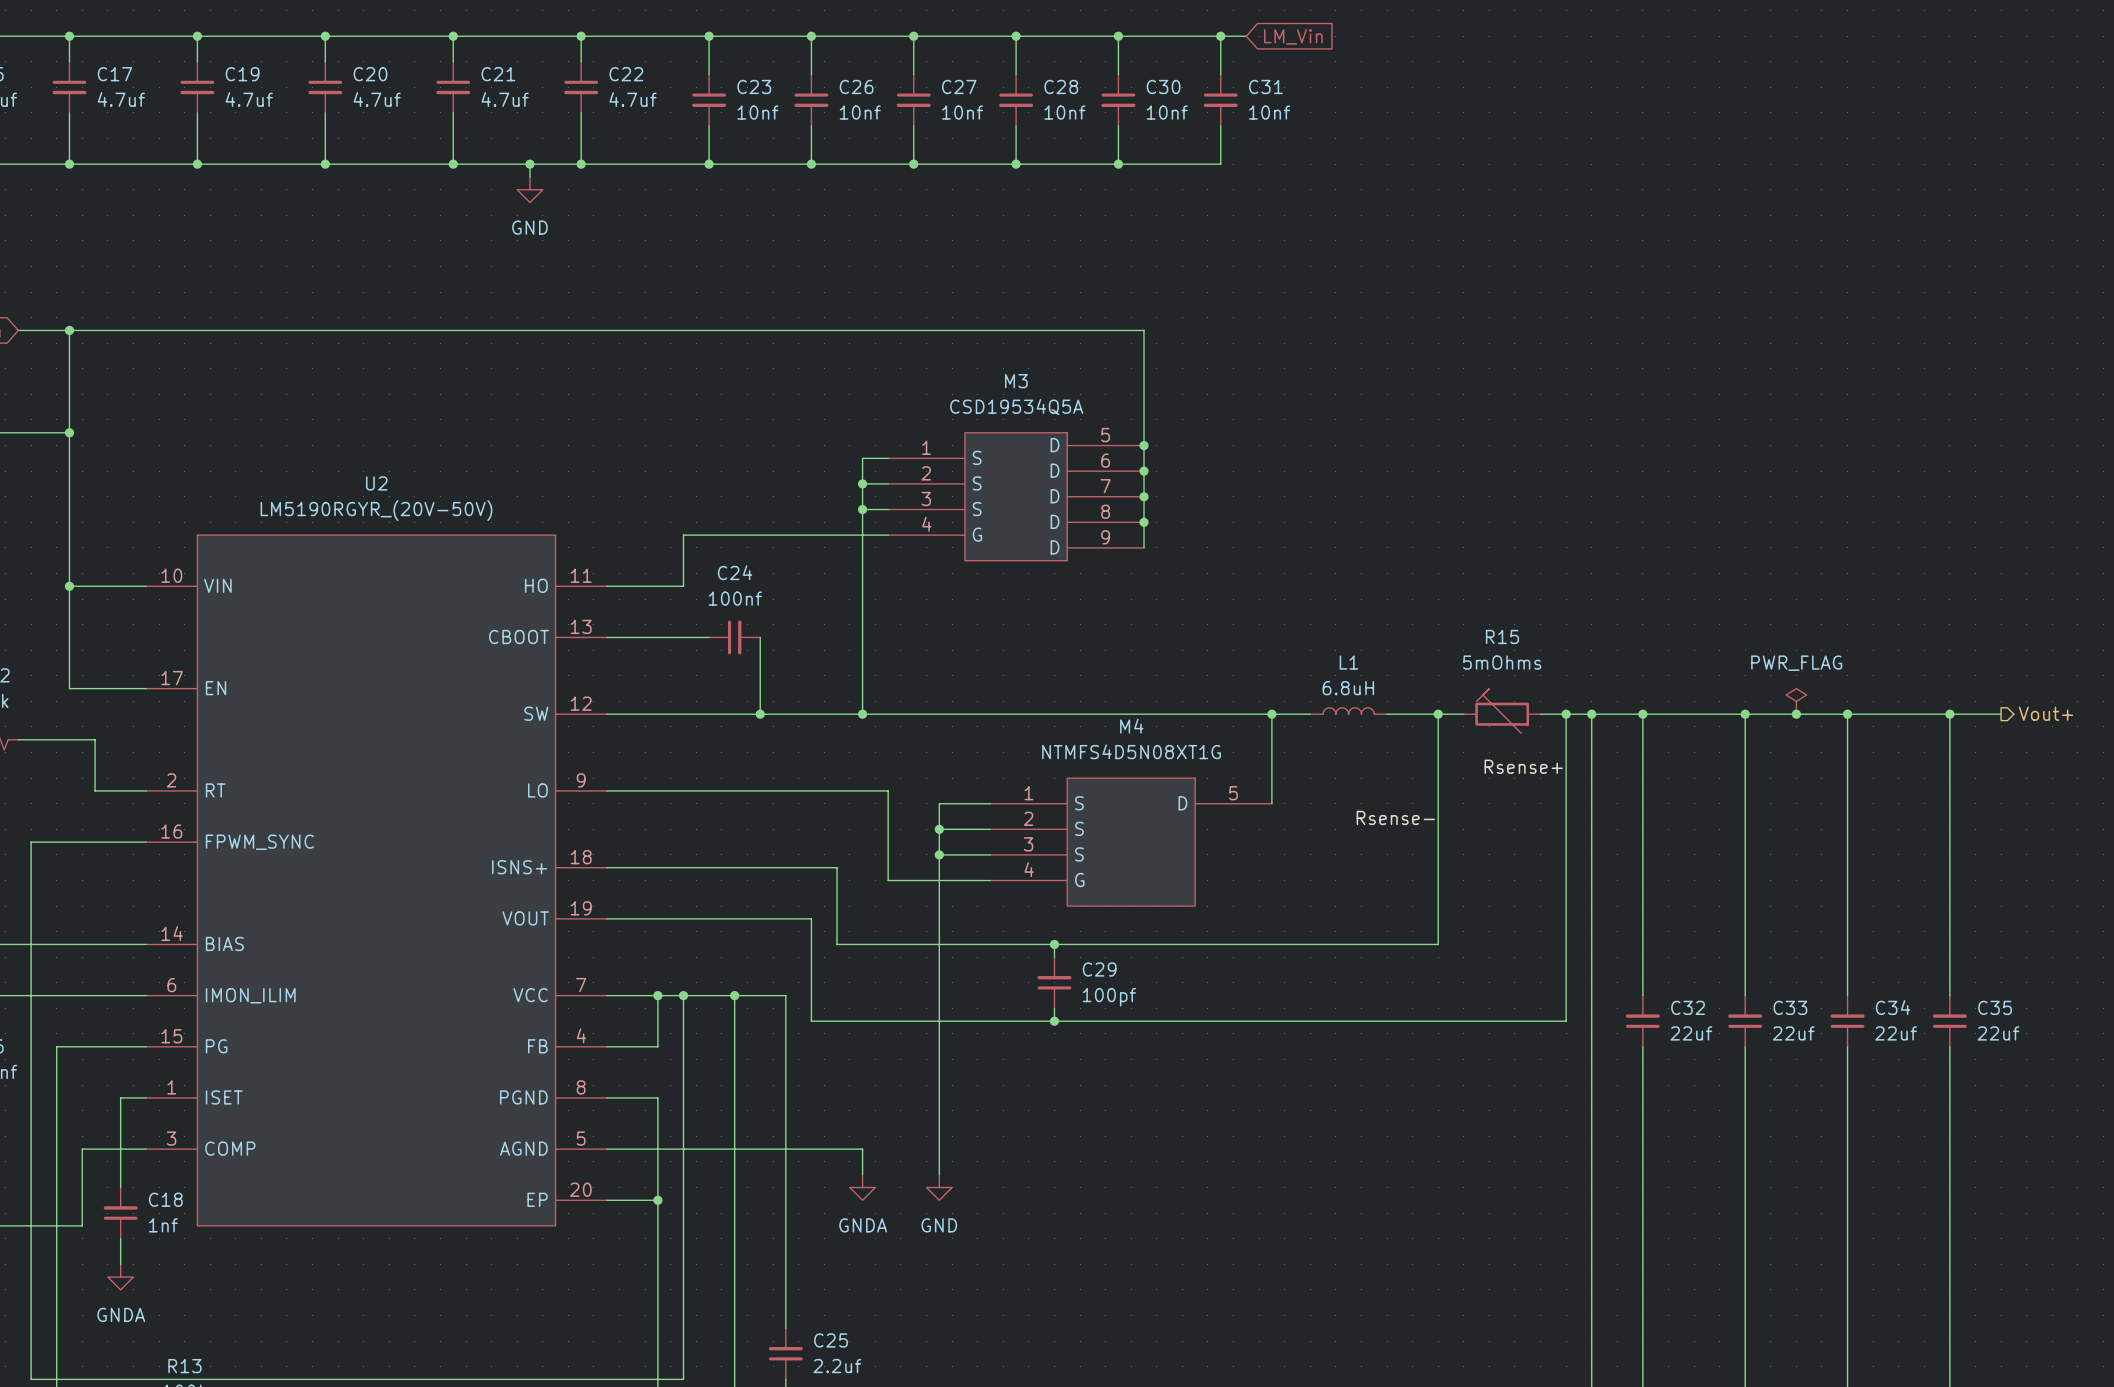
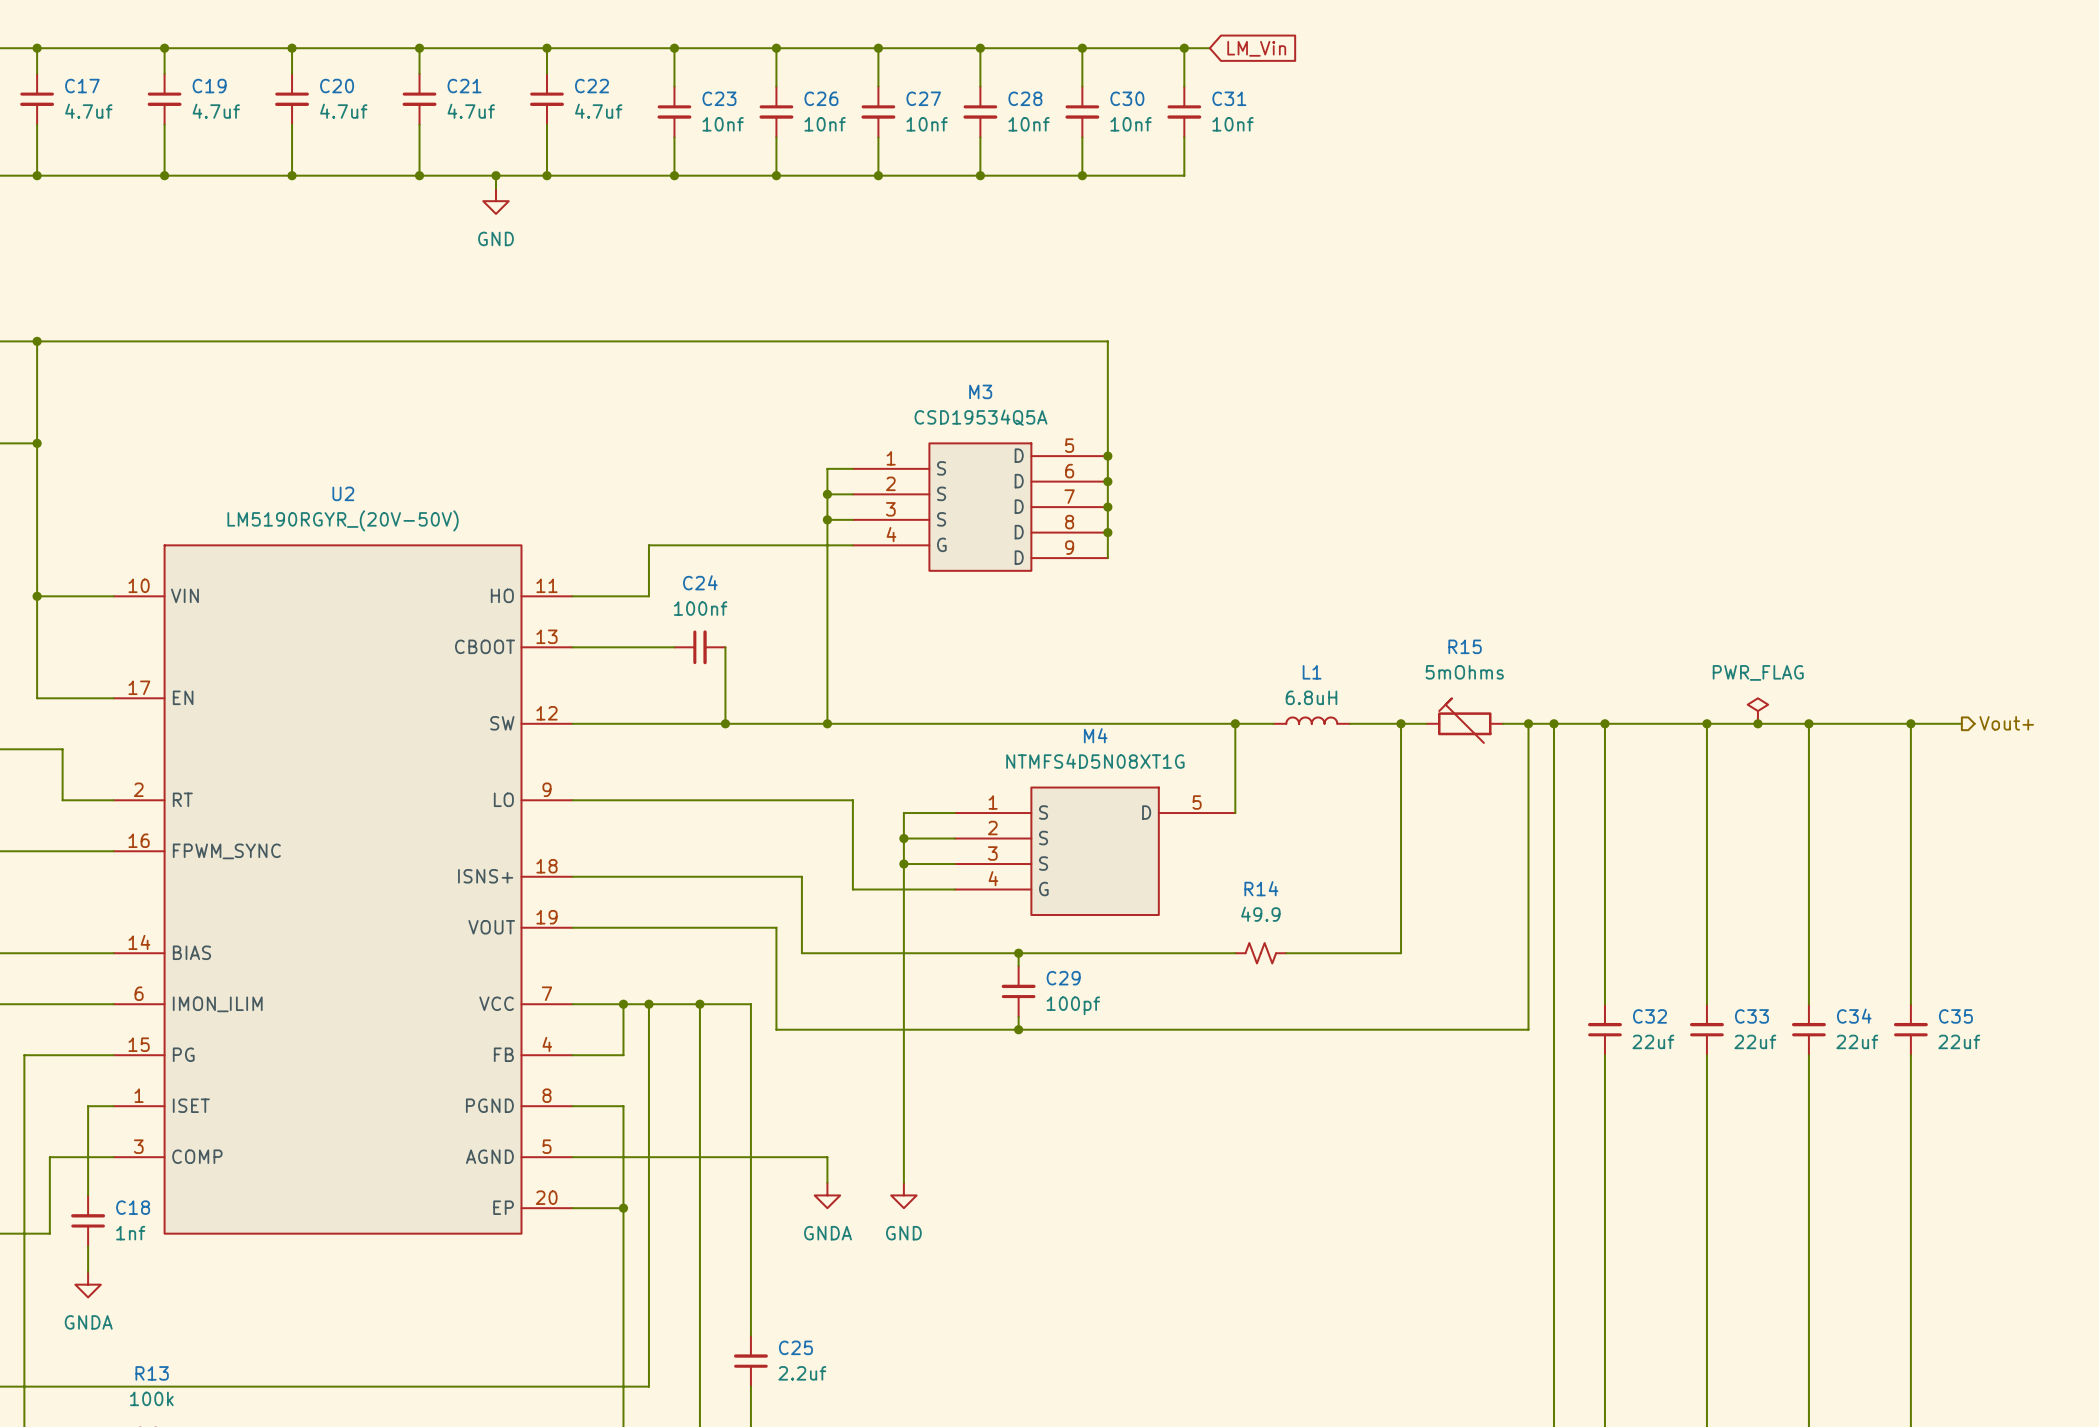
label: Rsense+ (1523, 766) -> none
label: Rsense- (1395, 817) -> none
R14: none -> 49.9 (1260, 953)

